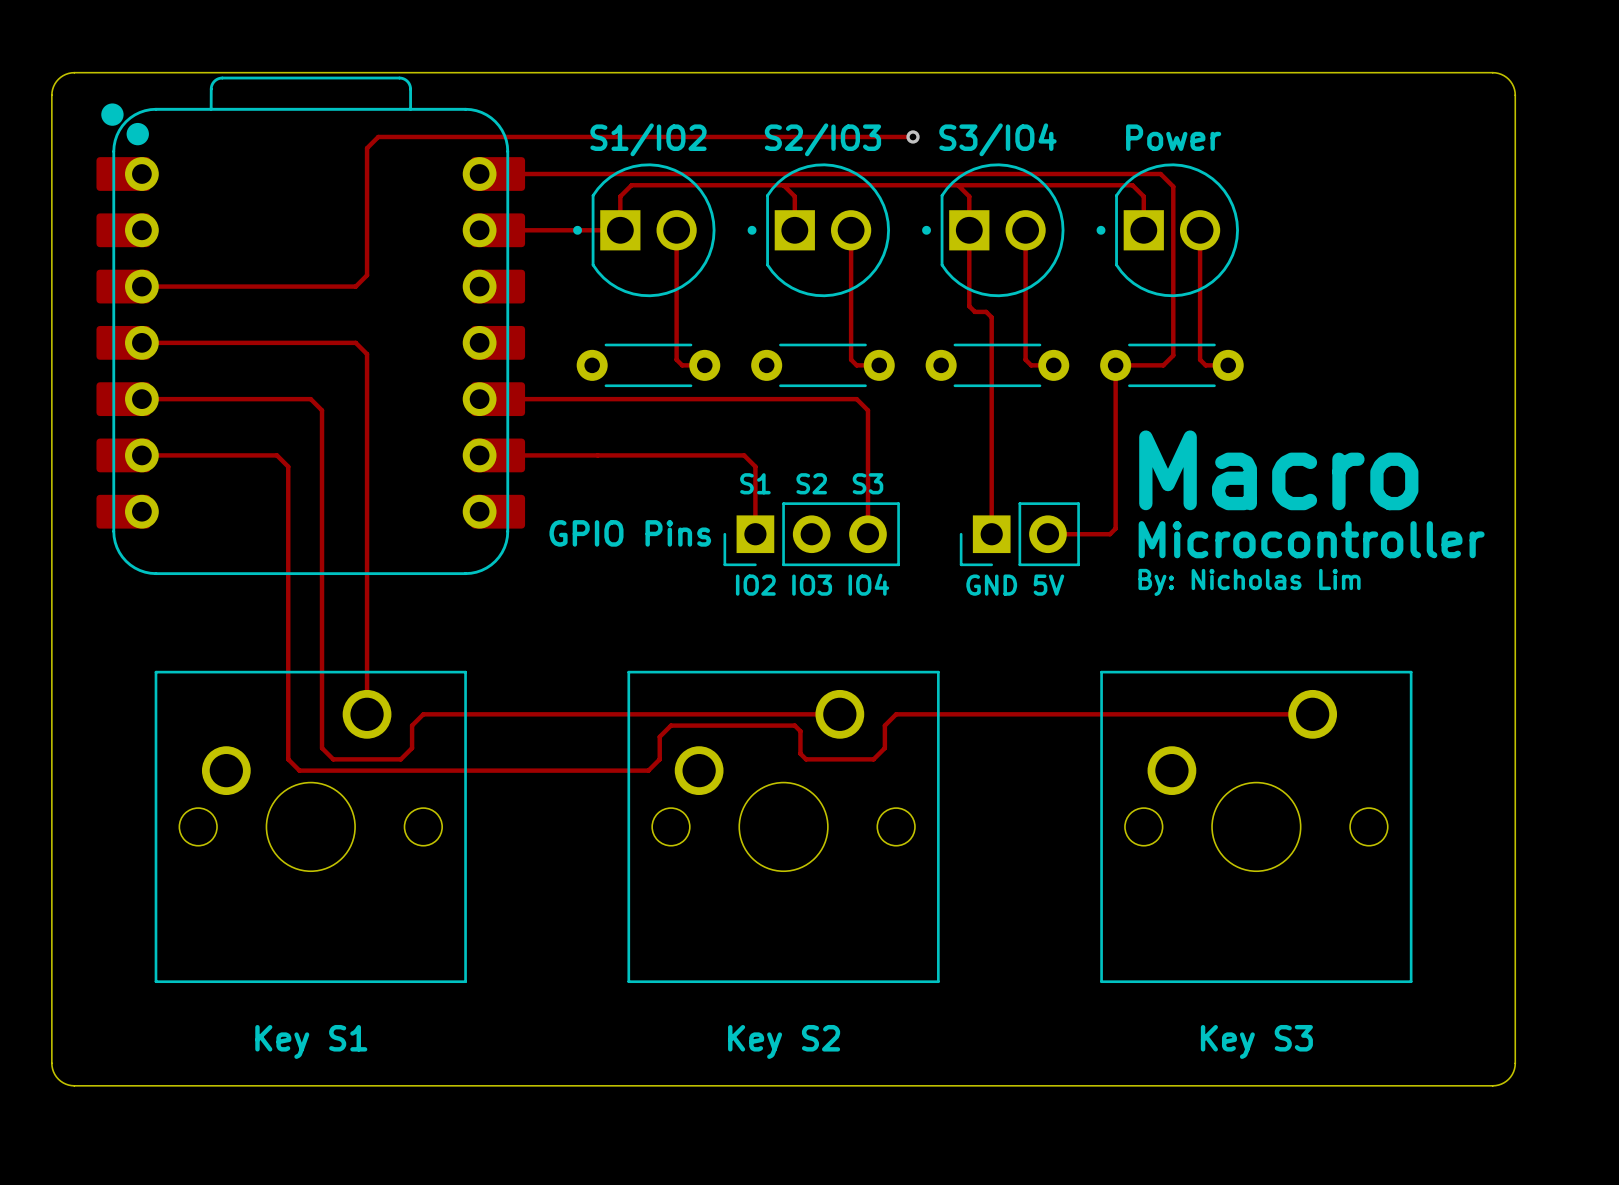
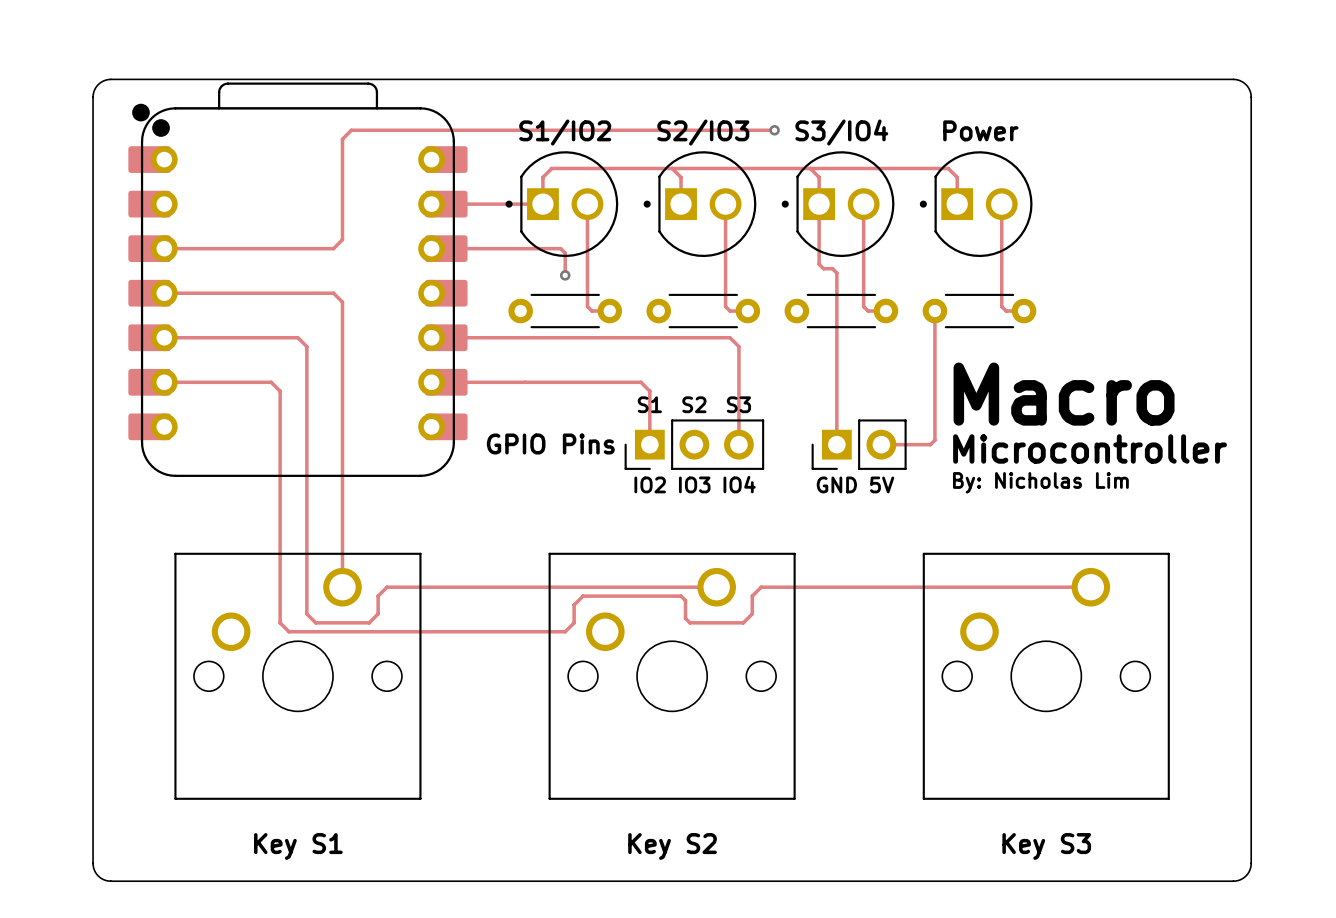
track: (498, 174) (1160, 174) (1173, 186) (1173, 355) (1163, 365) (1115, 365) -> none
track: none -> (446, 248) (560, 248) (565, 253) (565, 275)
via: none -> (565, 275)

